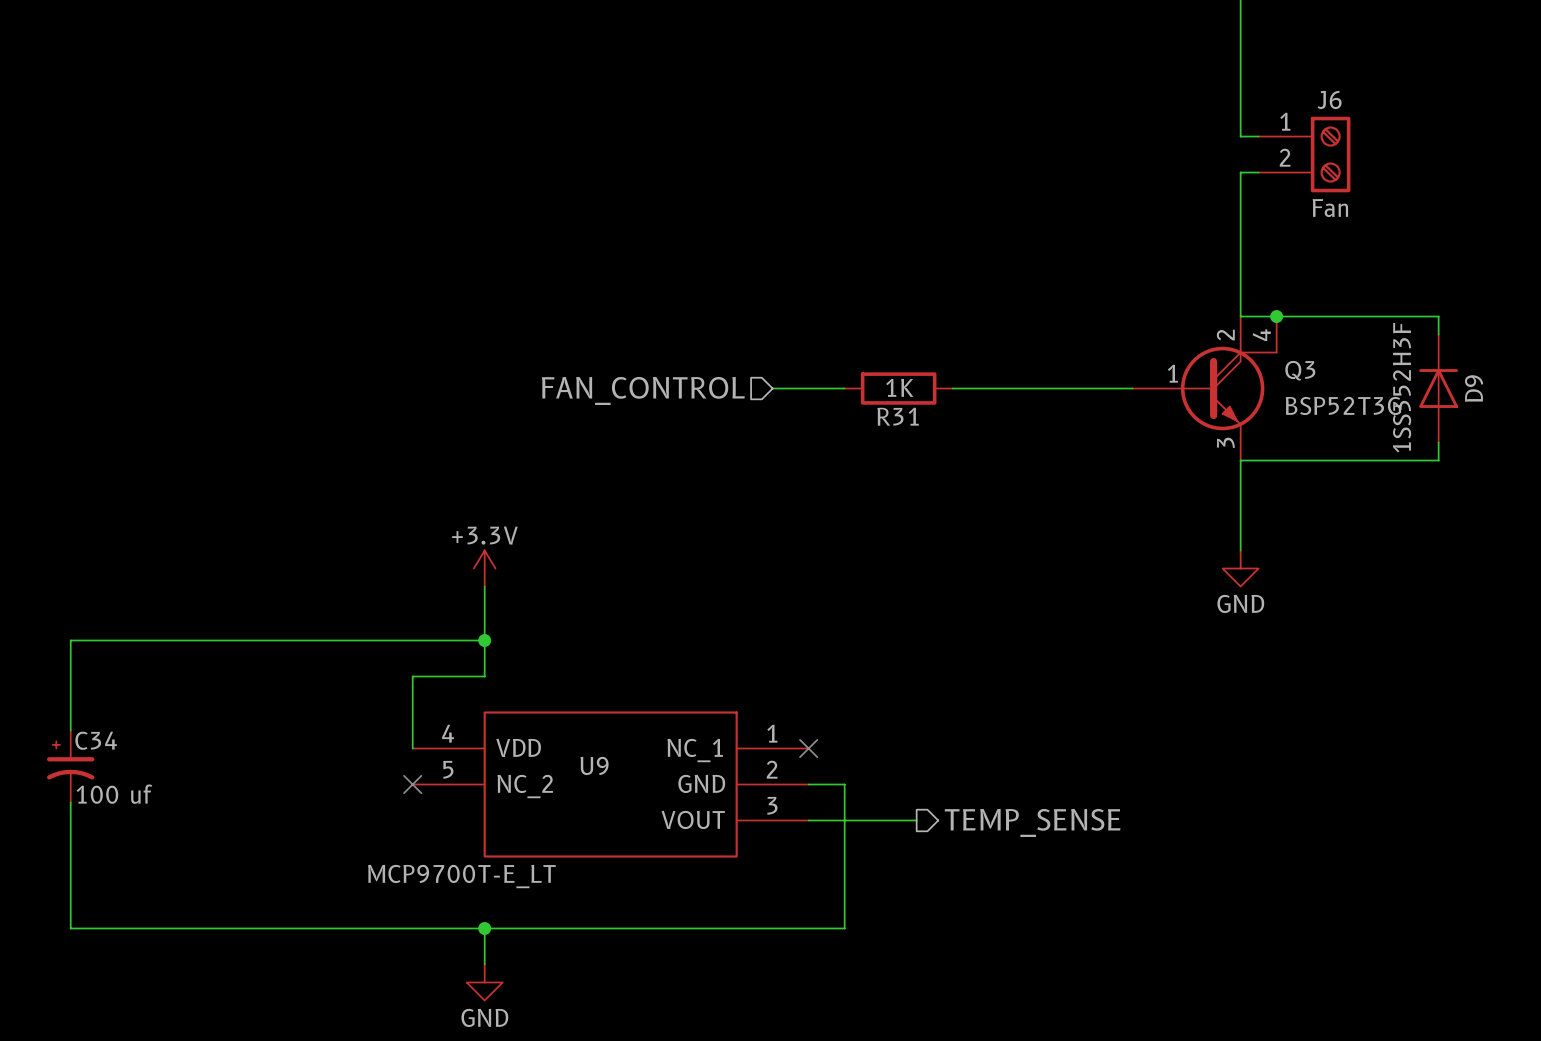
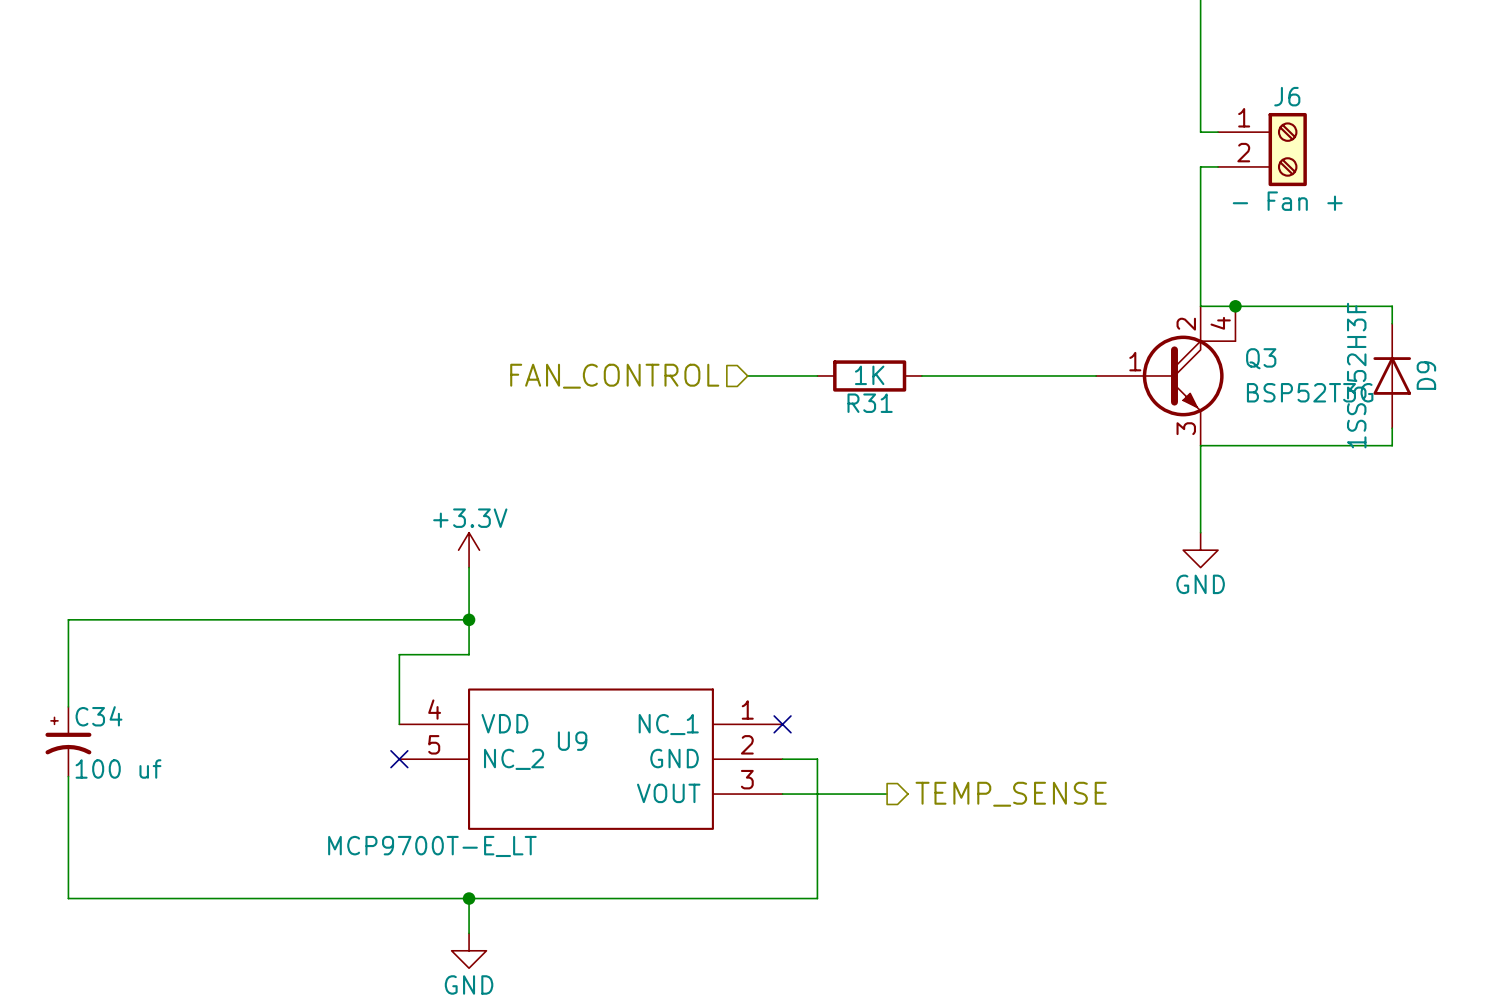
J6 value: Fan (1330, 208) -> - Fan + (1287, 201)

